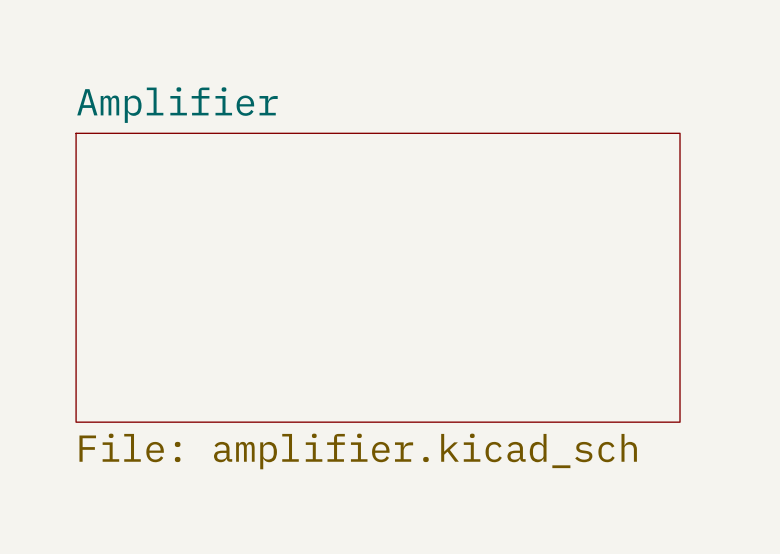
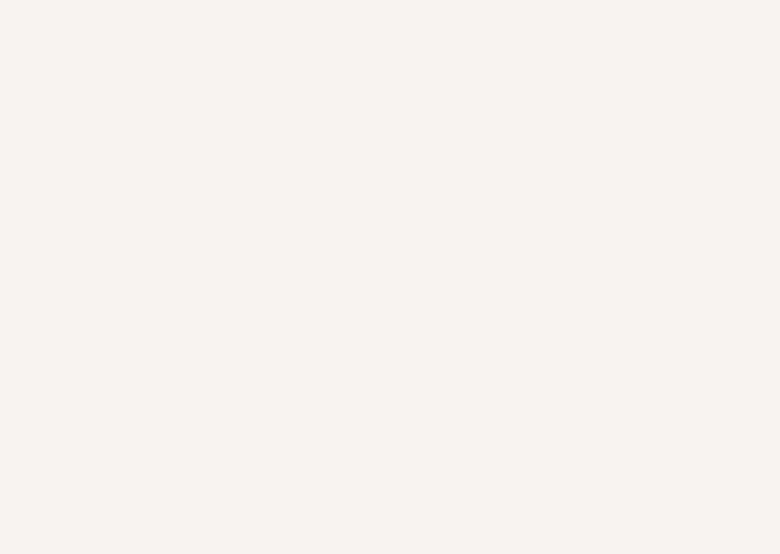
sheet Amplifier: File: amplifier.kicad_sch (378, 277) -> none

